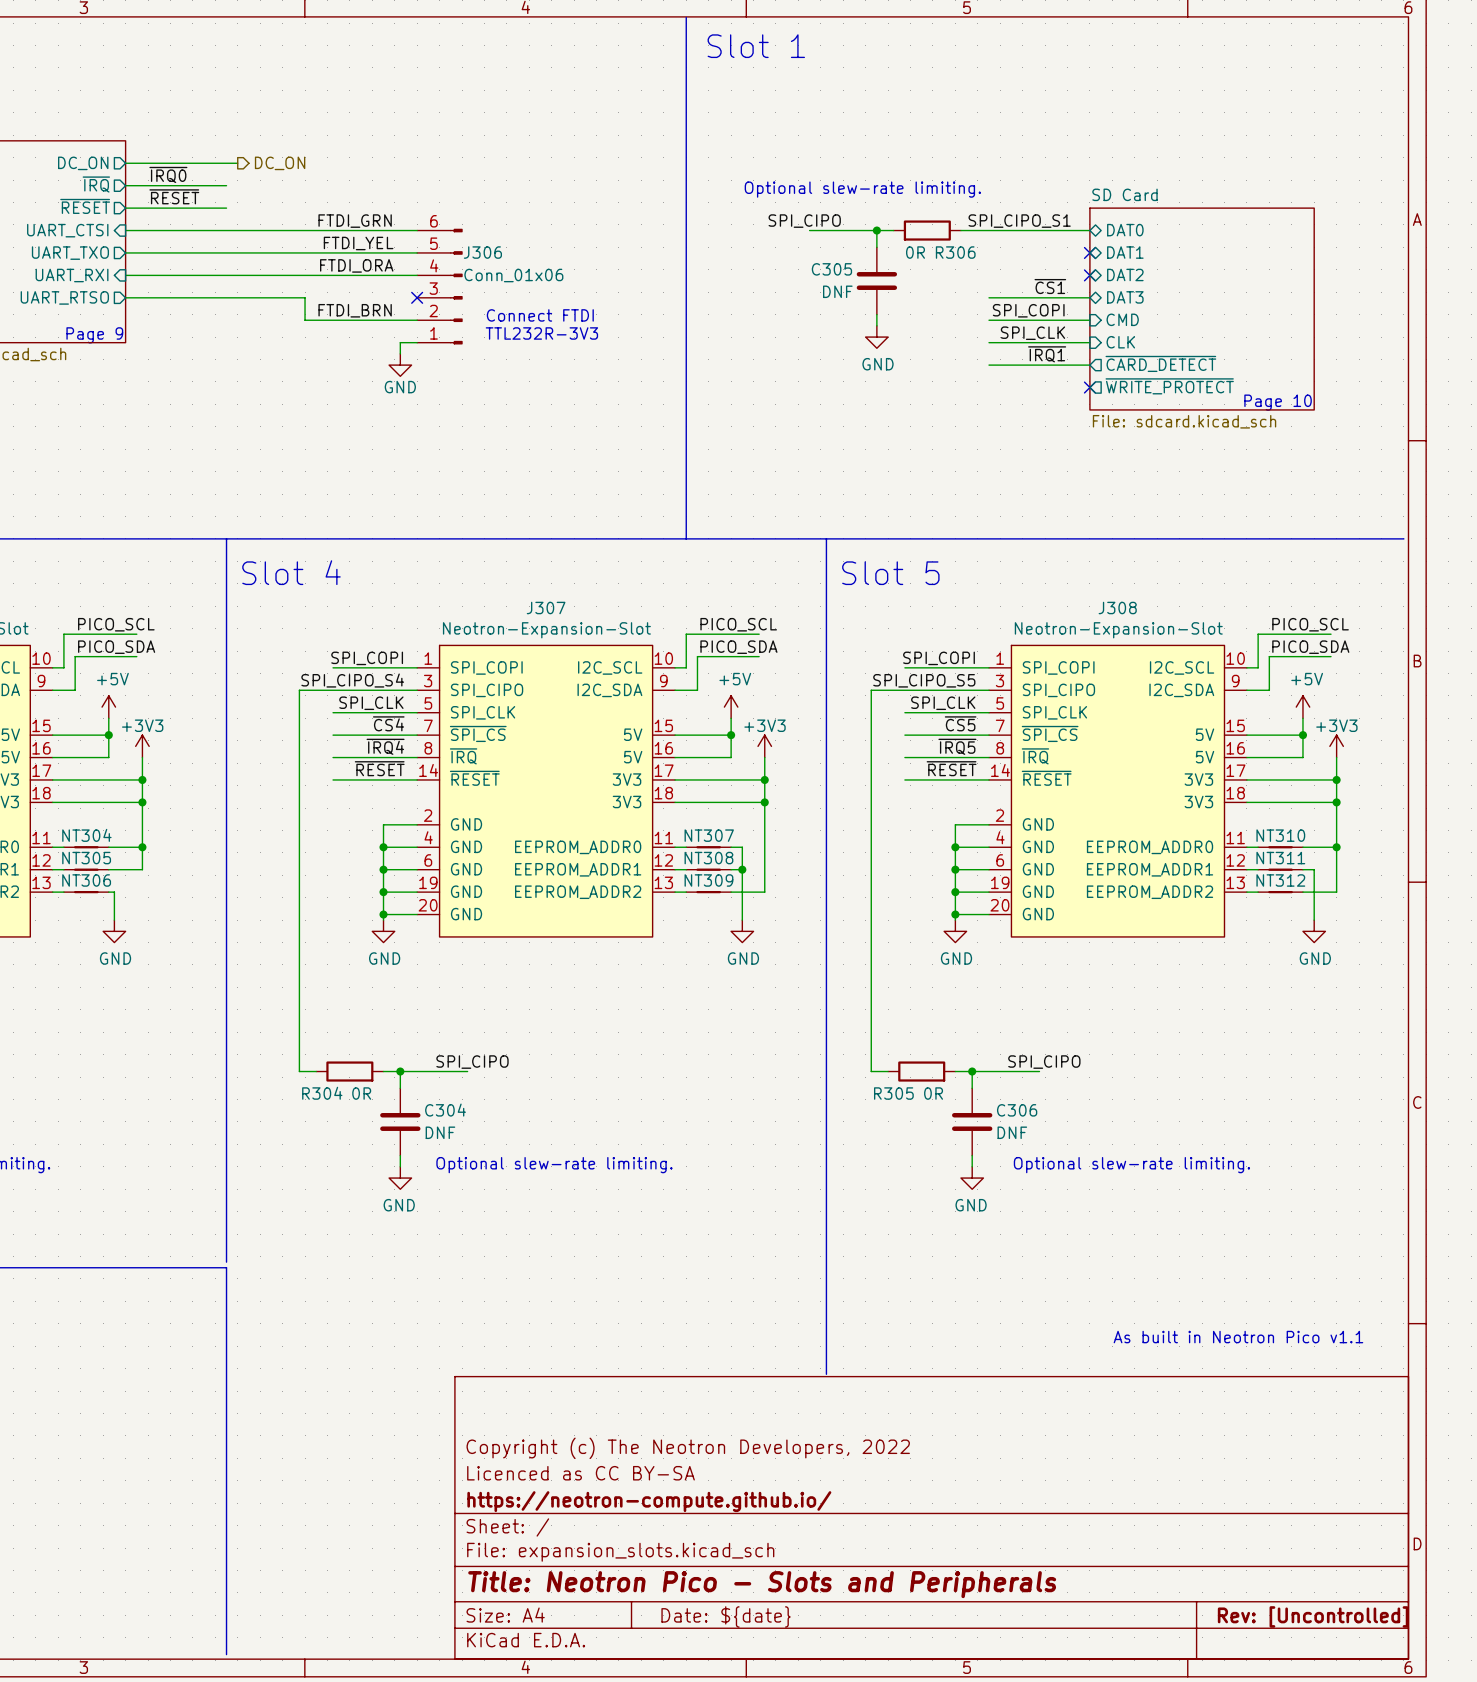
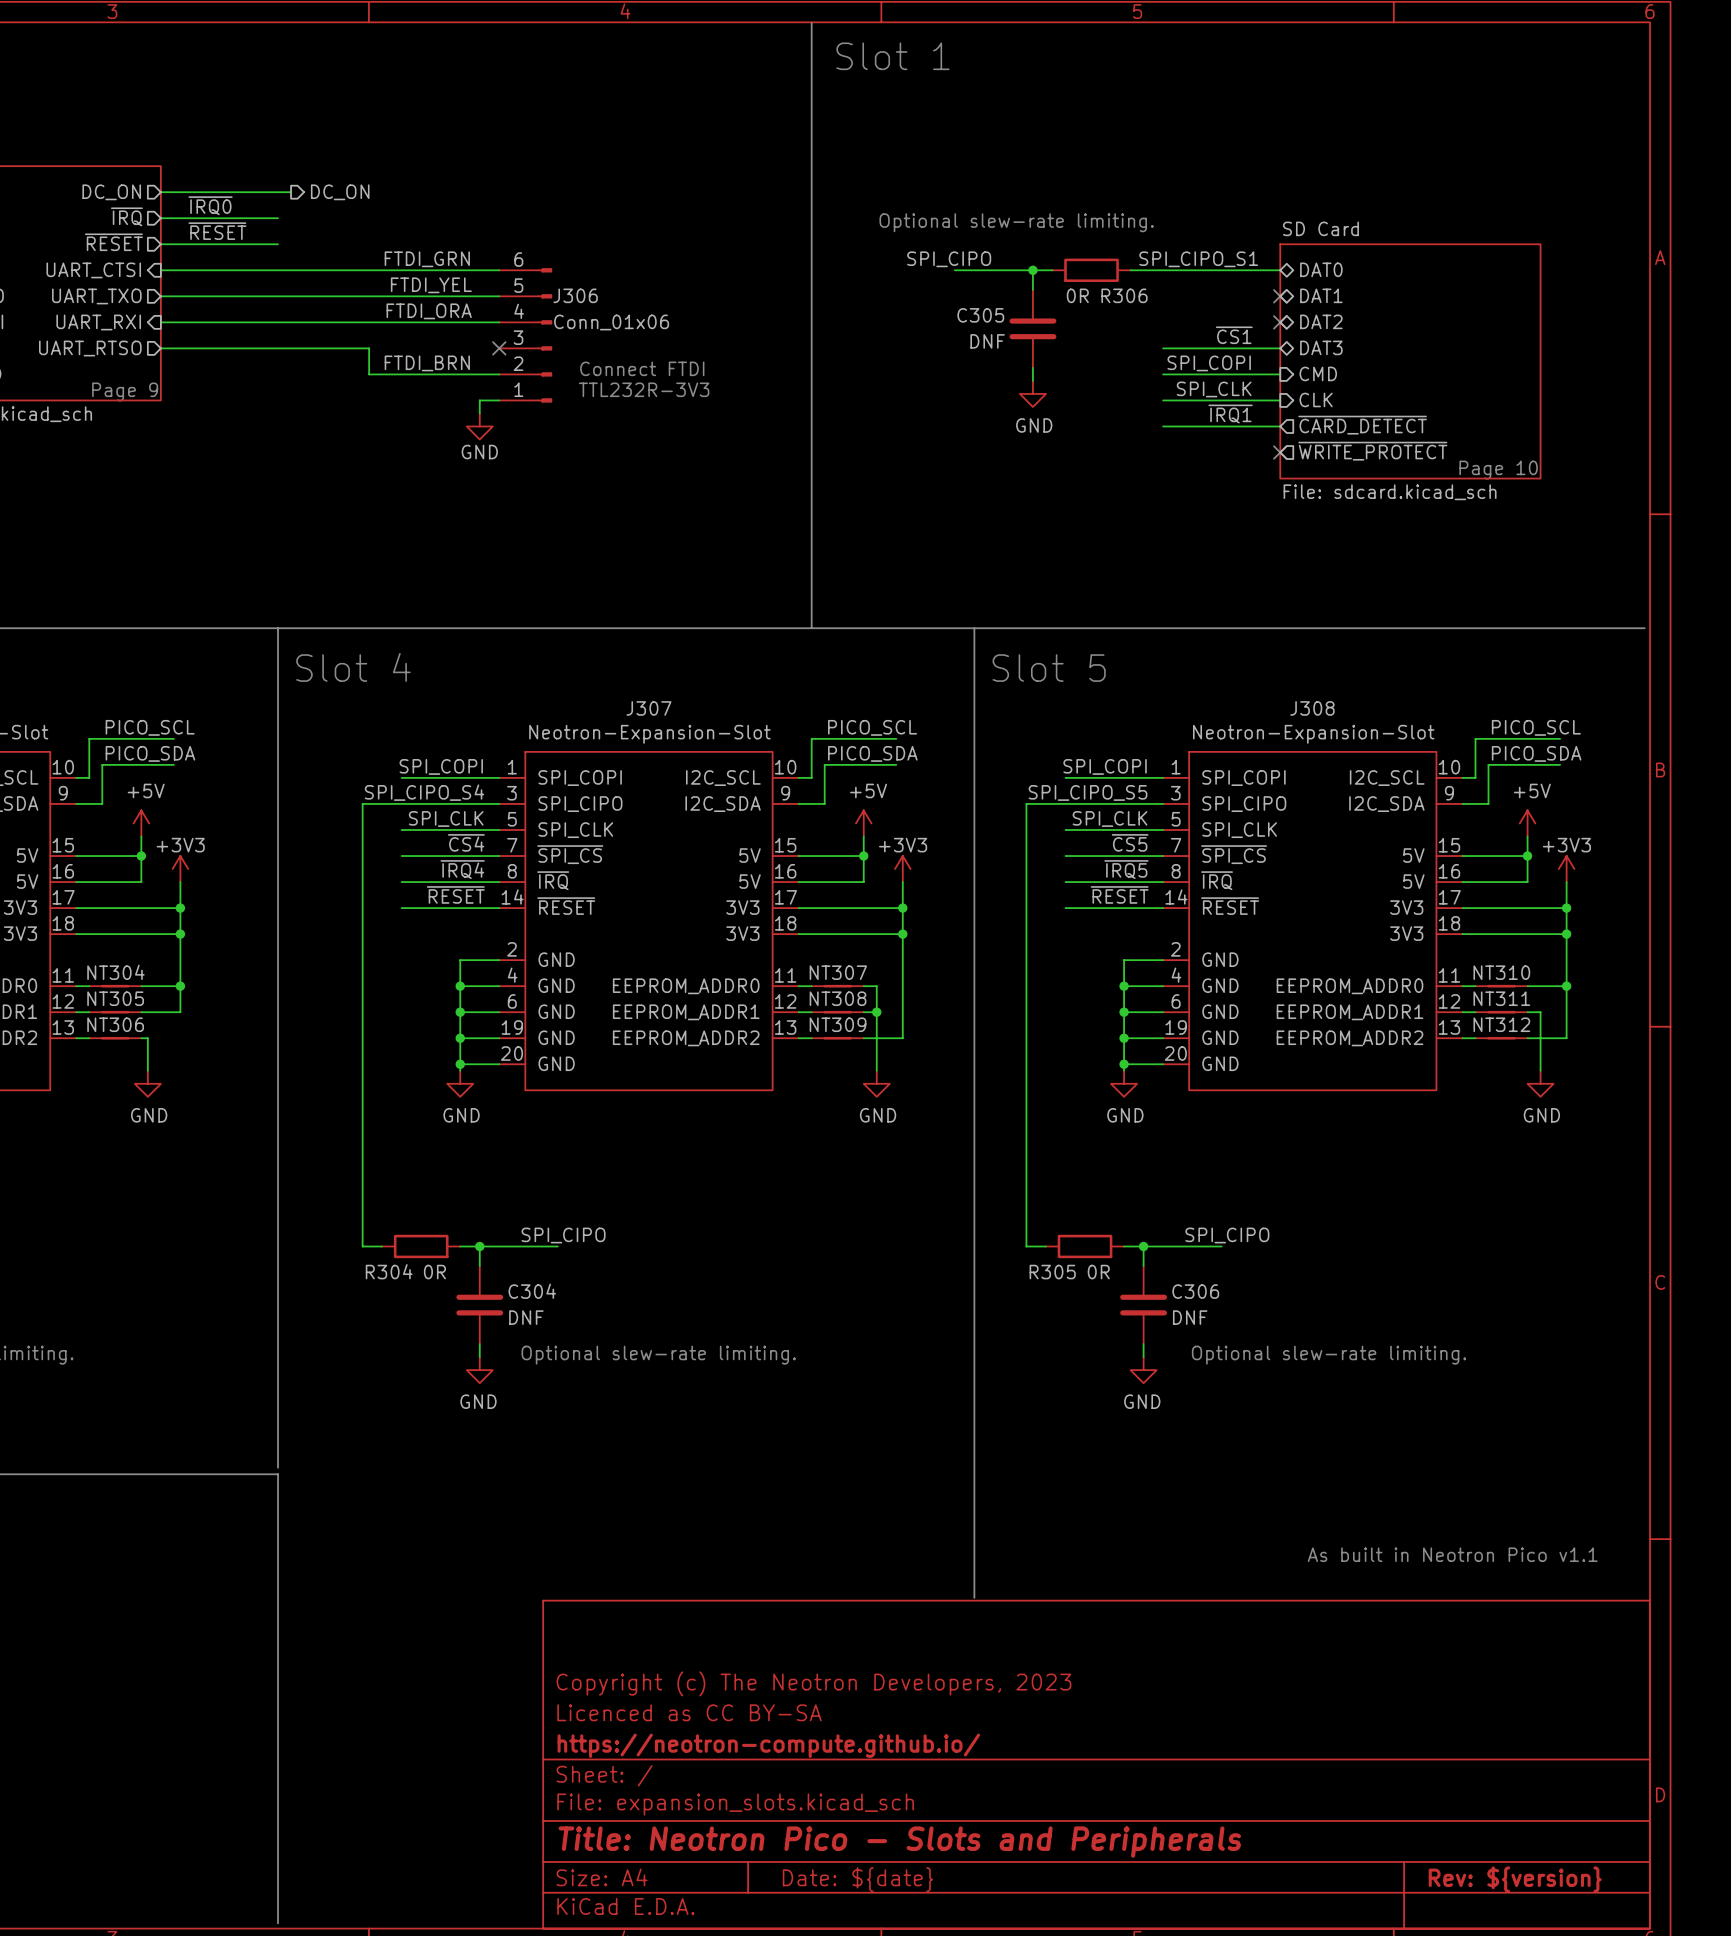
title block: Copyright (c) The Neotron Developers, 2022 (688, 1448) -> Copyright (c) The Neotron Developers, 2023 (813, 1683)
title block: Rev: [Uncontrolled] (1313, 1616) -> Rev: ${version} (1515, 1879)

